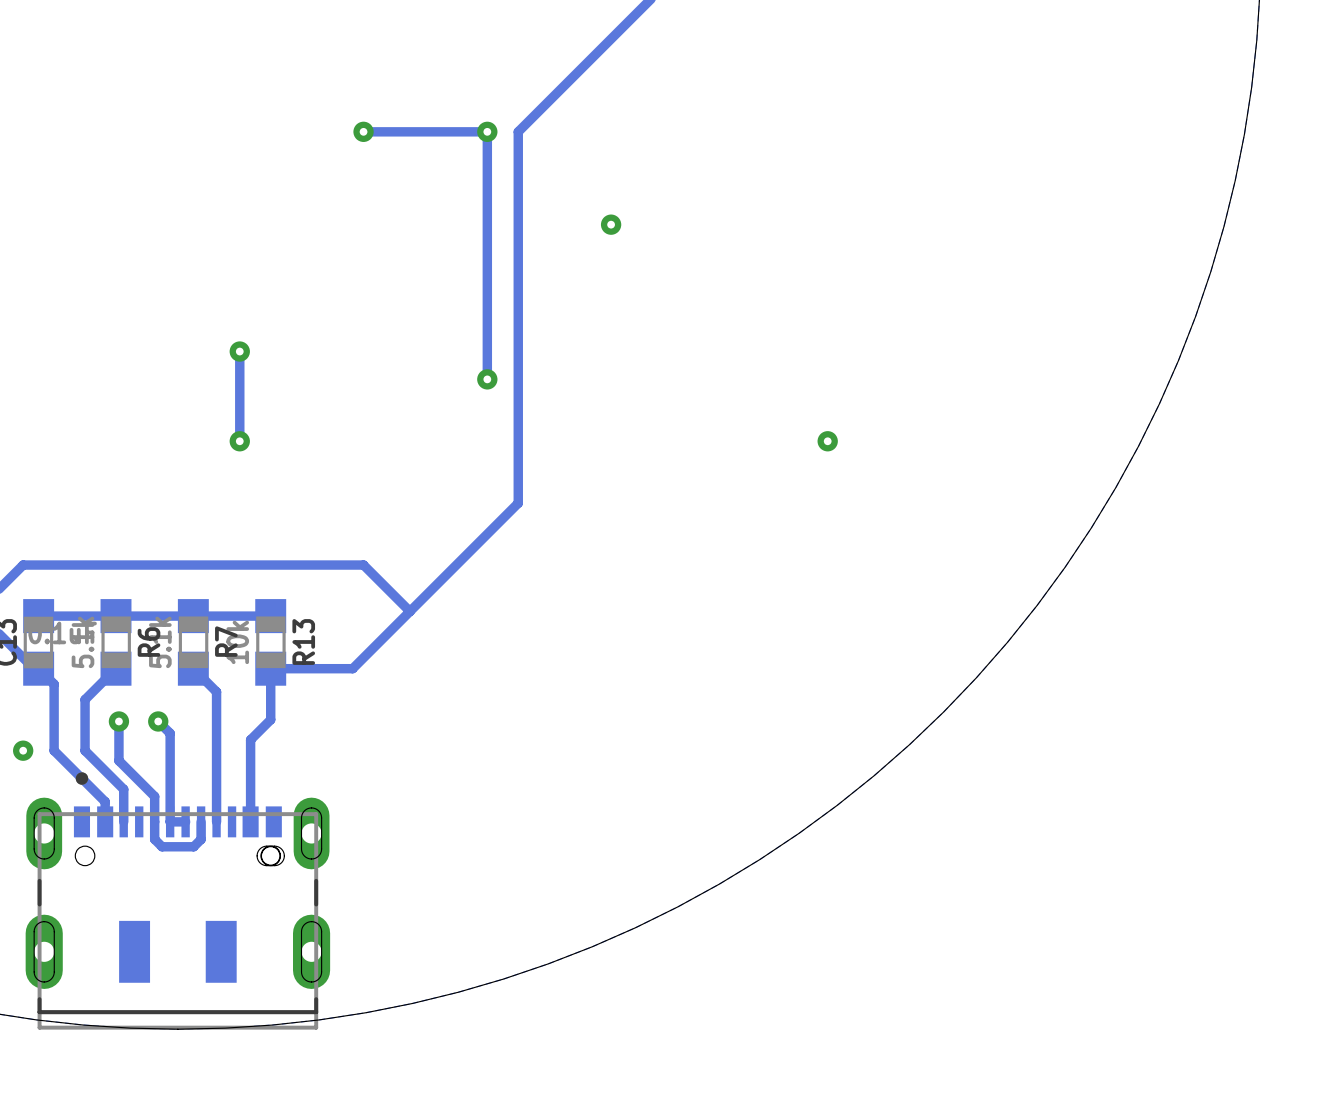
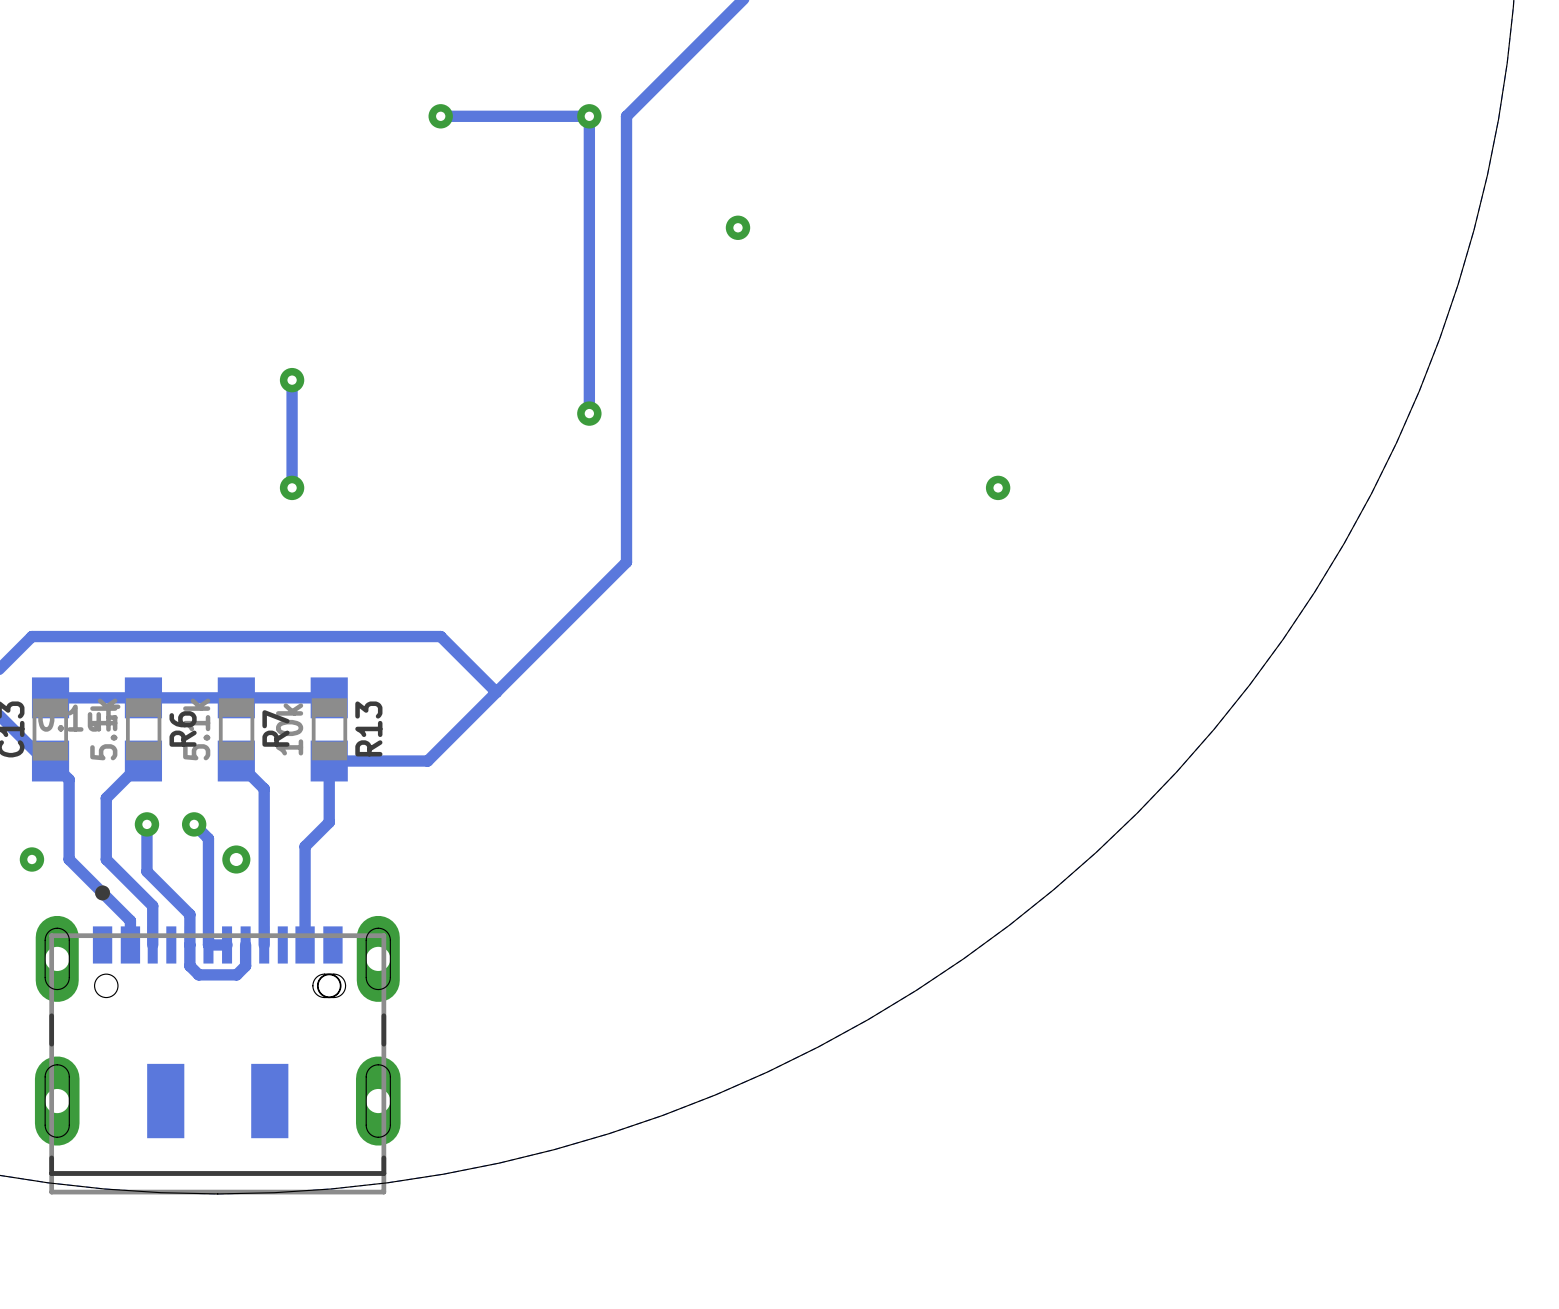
via: none -> (236, 859)

